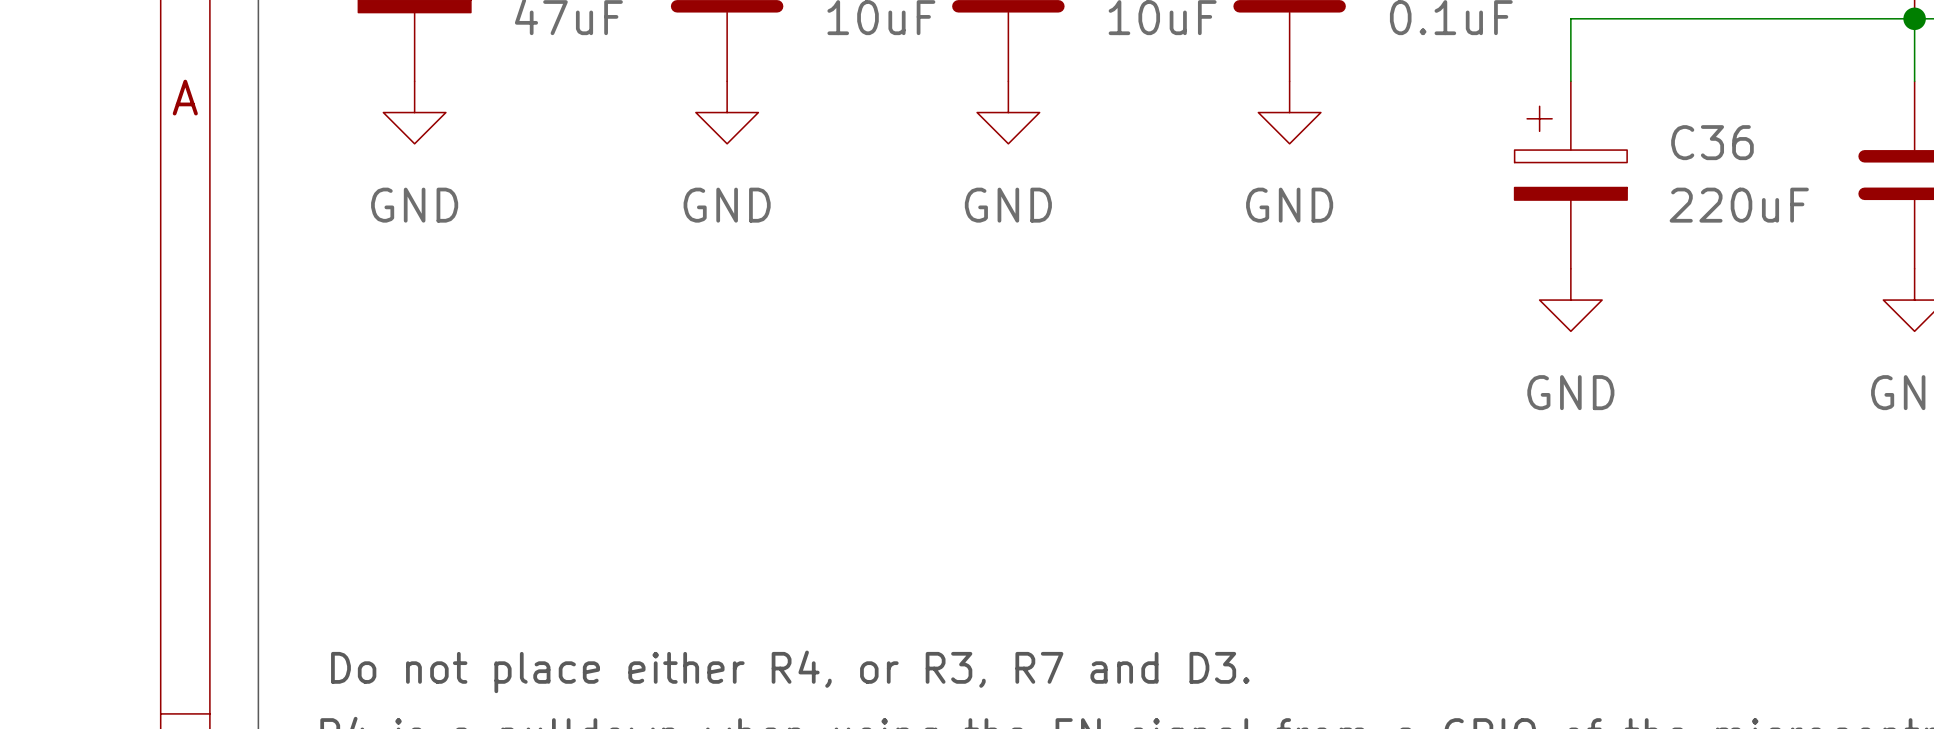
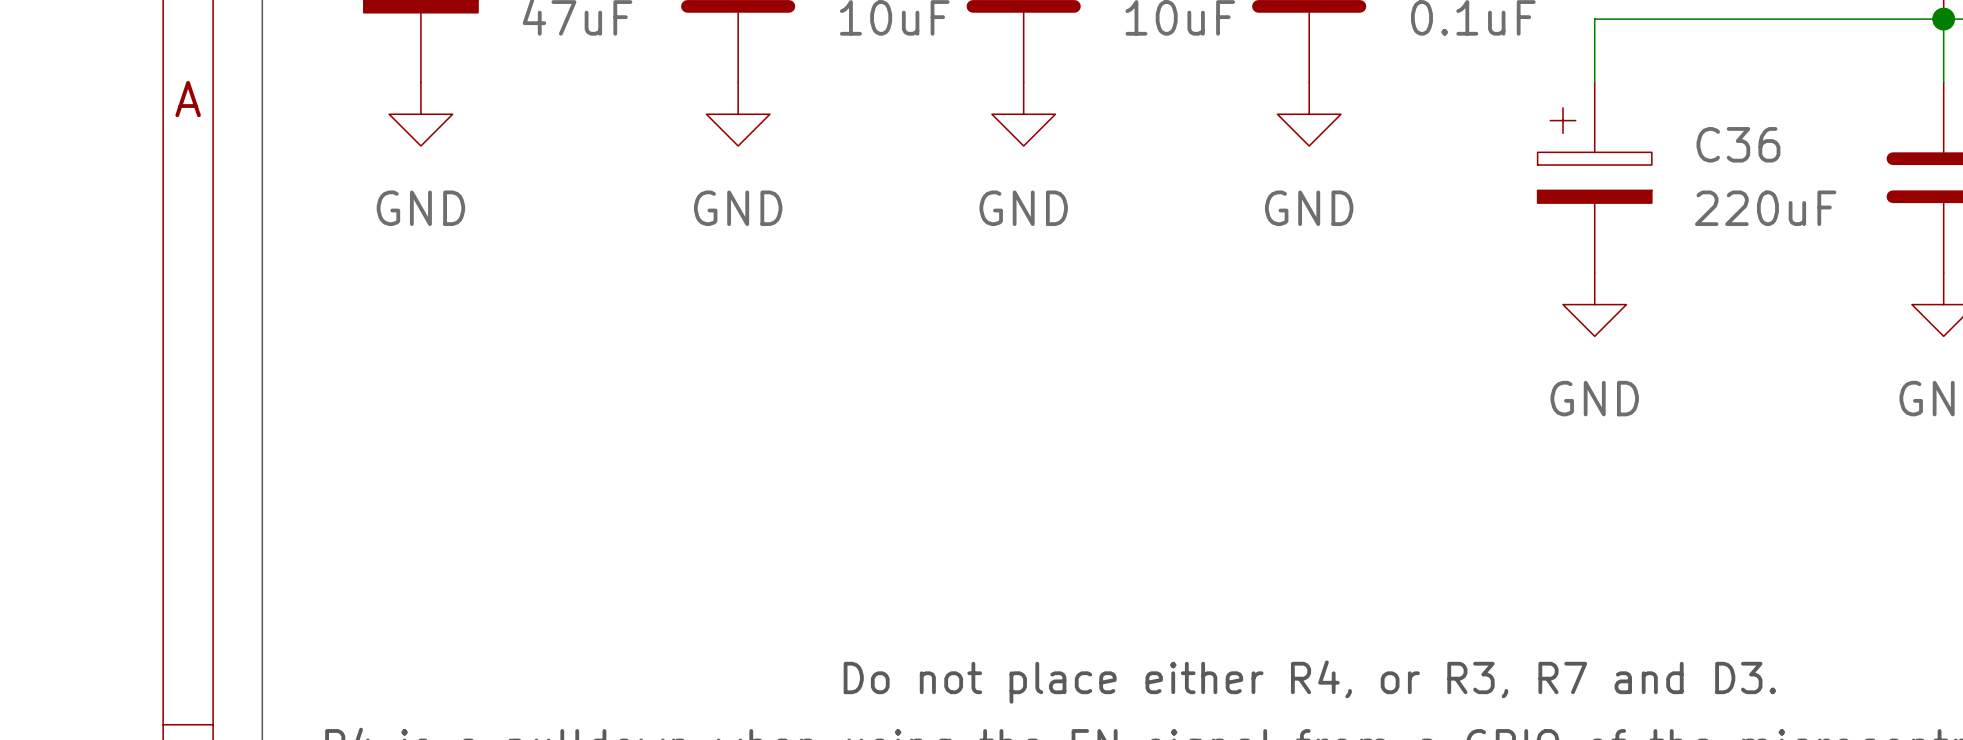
text position: Do not place either R4, or R3, R7 and D3. (790, 671) -> Do not place either R4, or R3, R7 and D3. (1309, 682)

